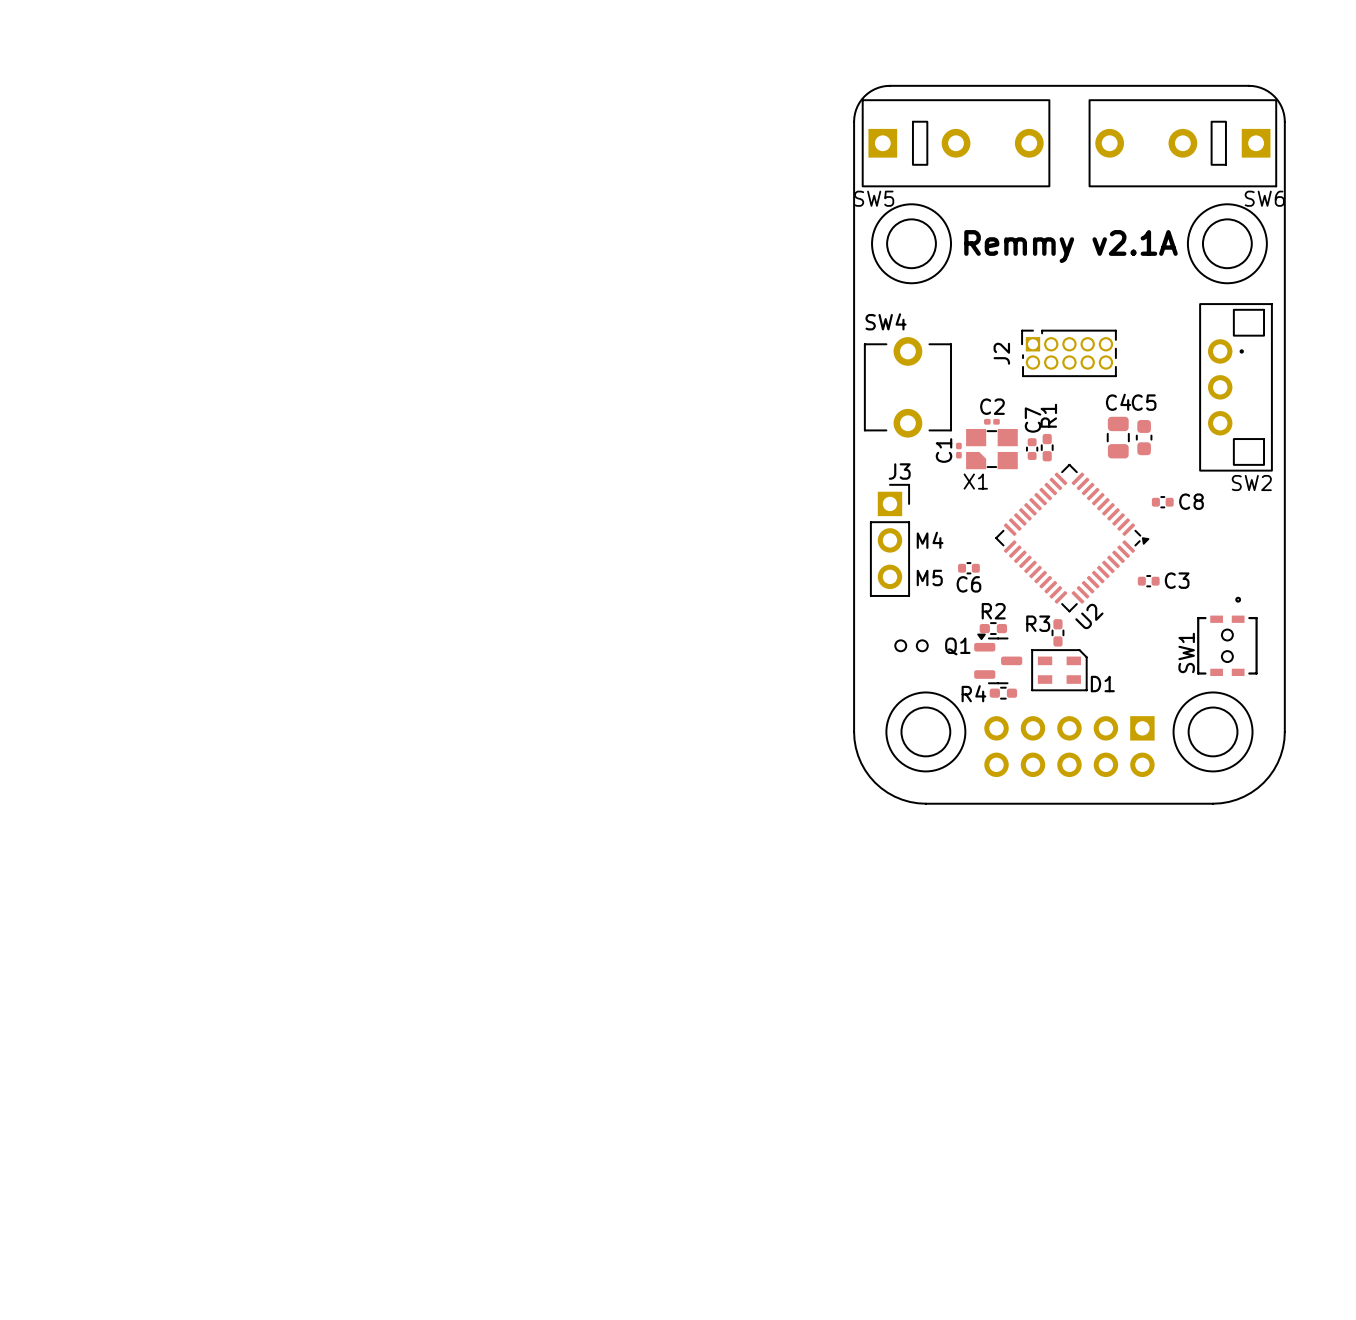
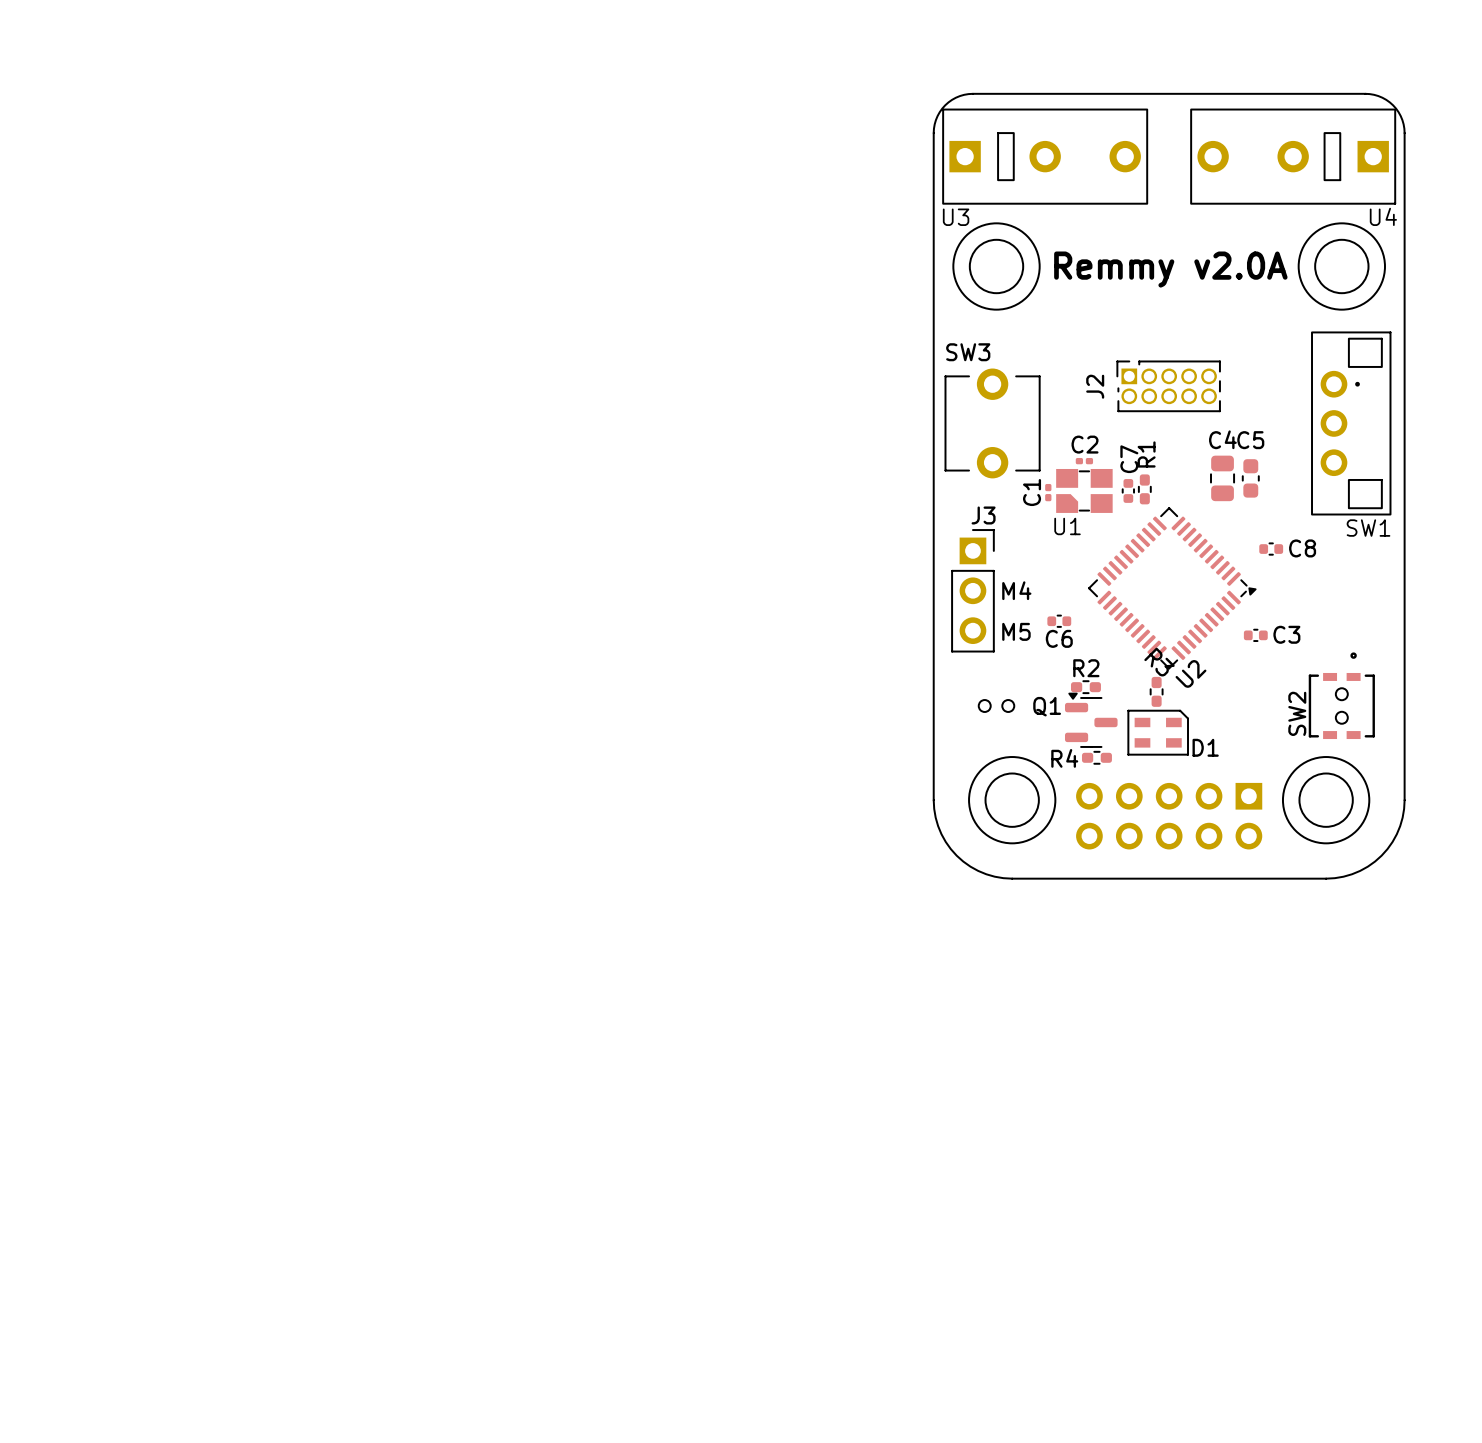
SW5 name: SW5 (874, 198) -> U3 (956, 217)
SW6 name: SW6 (1264, 198) -> U4 (1383, 216)
text: Remmy v2.1A (1071, 246) -> Remmy v2.0A (1170, 269)
SW4 name: SW4 (886, 321) -> SW3 (968, 352)
X1 name: X1 (975, 481) -> U1 (1067, 526)
SW2 name: SW2 (1251, 483) -> SW1 (1368, 528)
R3 name rotation: 0° (1038, 623) -> 45° clockwise (1159, 662)
SW1 name: SW1 (1186, 652) -> SW2 (1297, 713)

